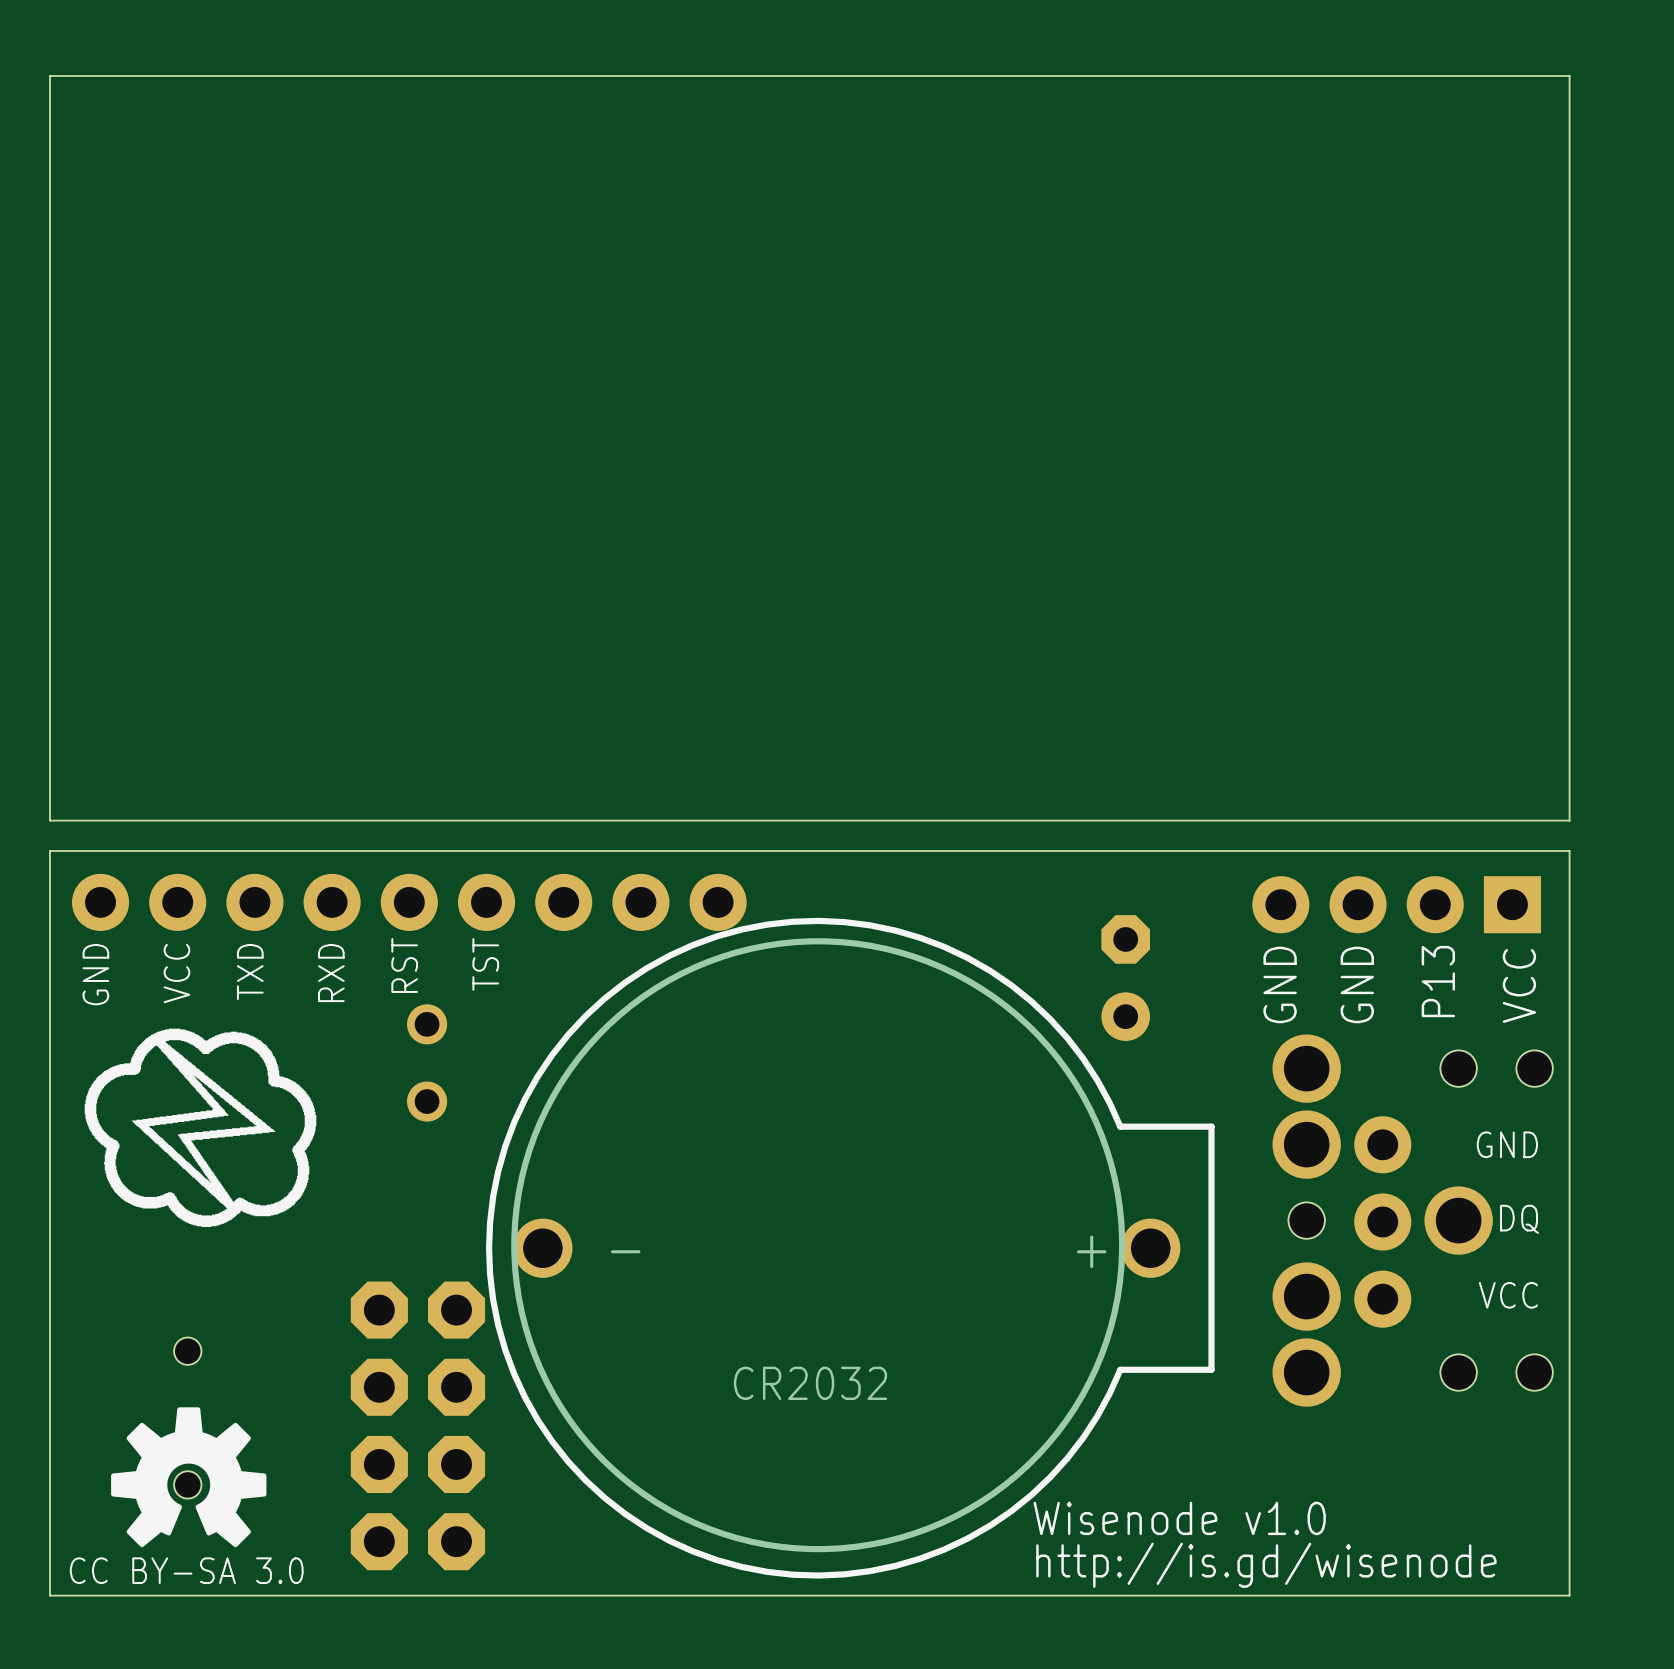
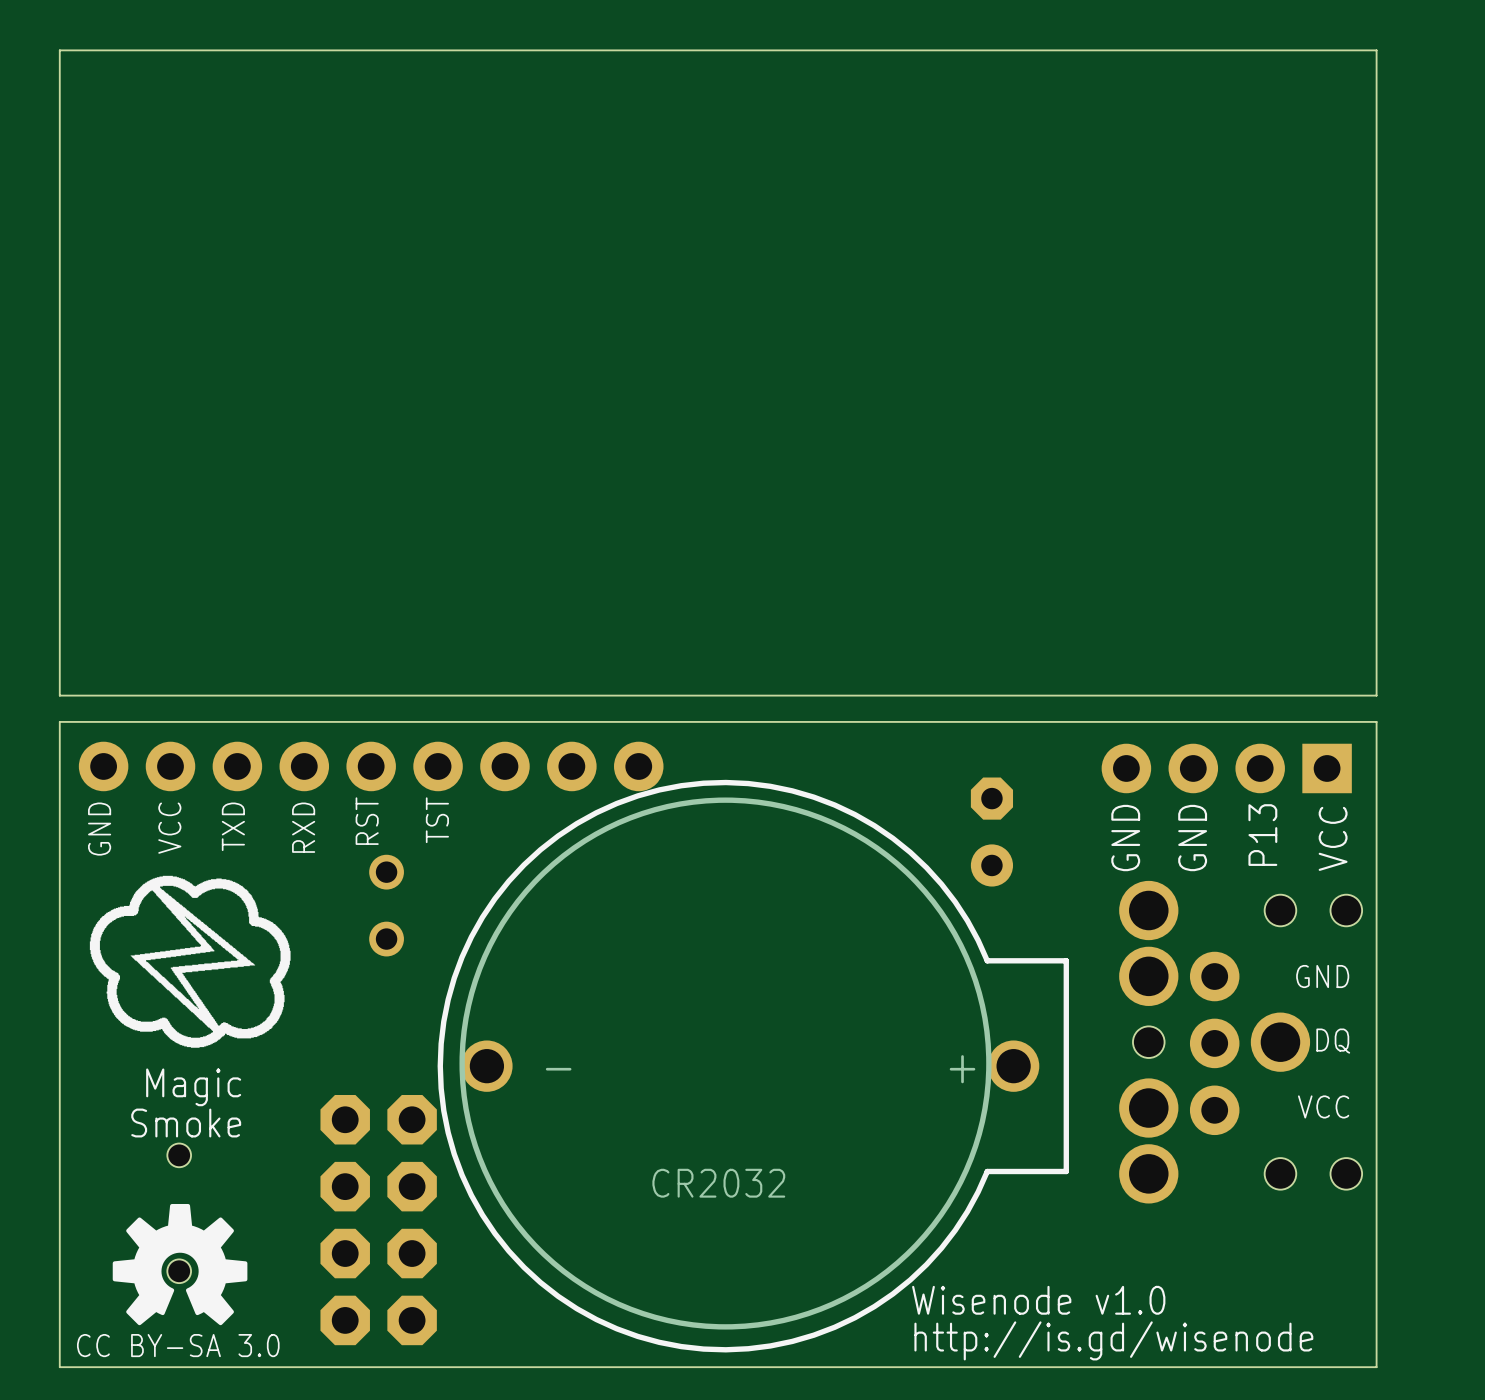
text: none -> Magic (193, 1087)
text: none -> Smoke (186, 1123)

